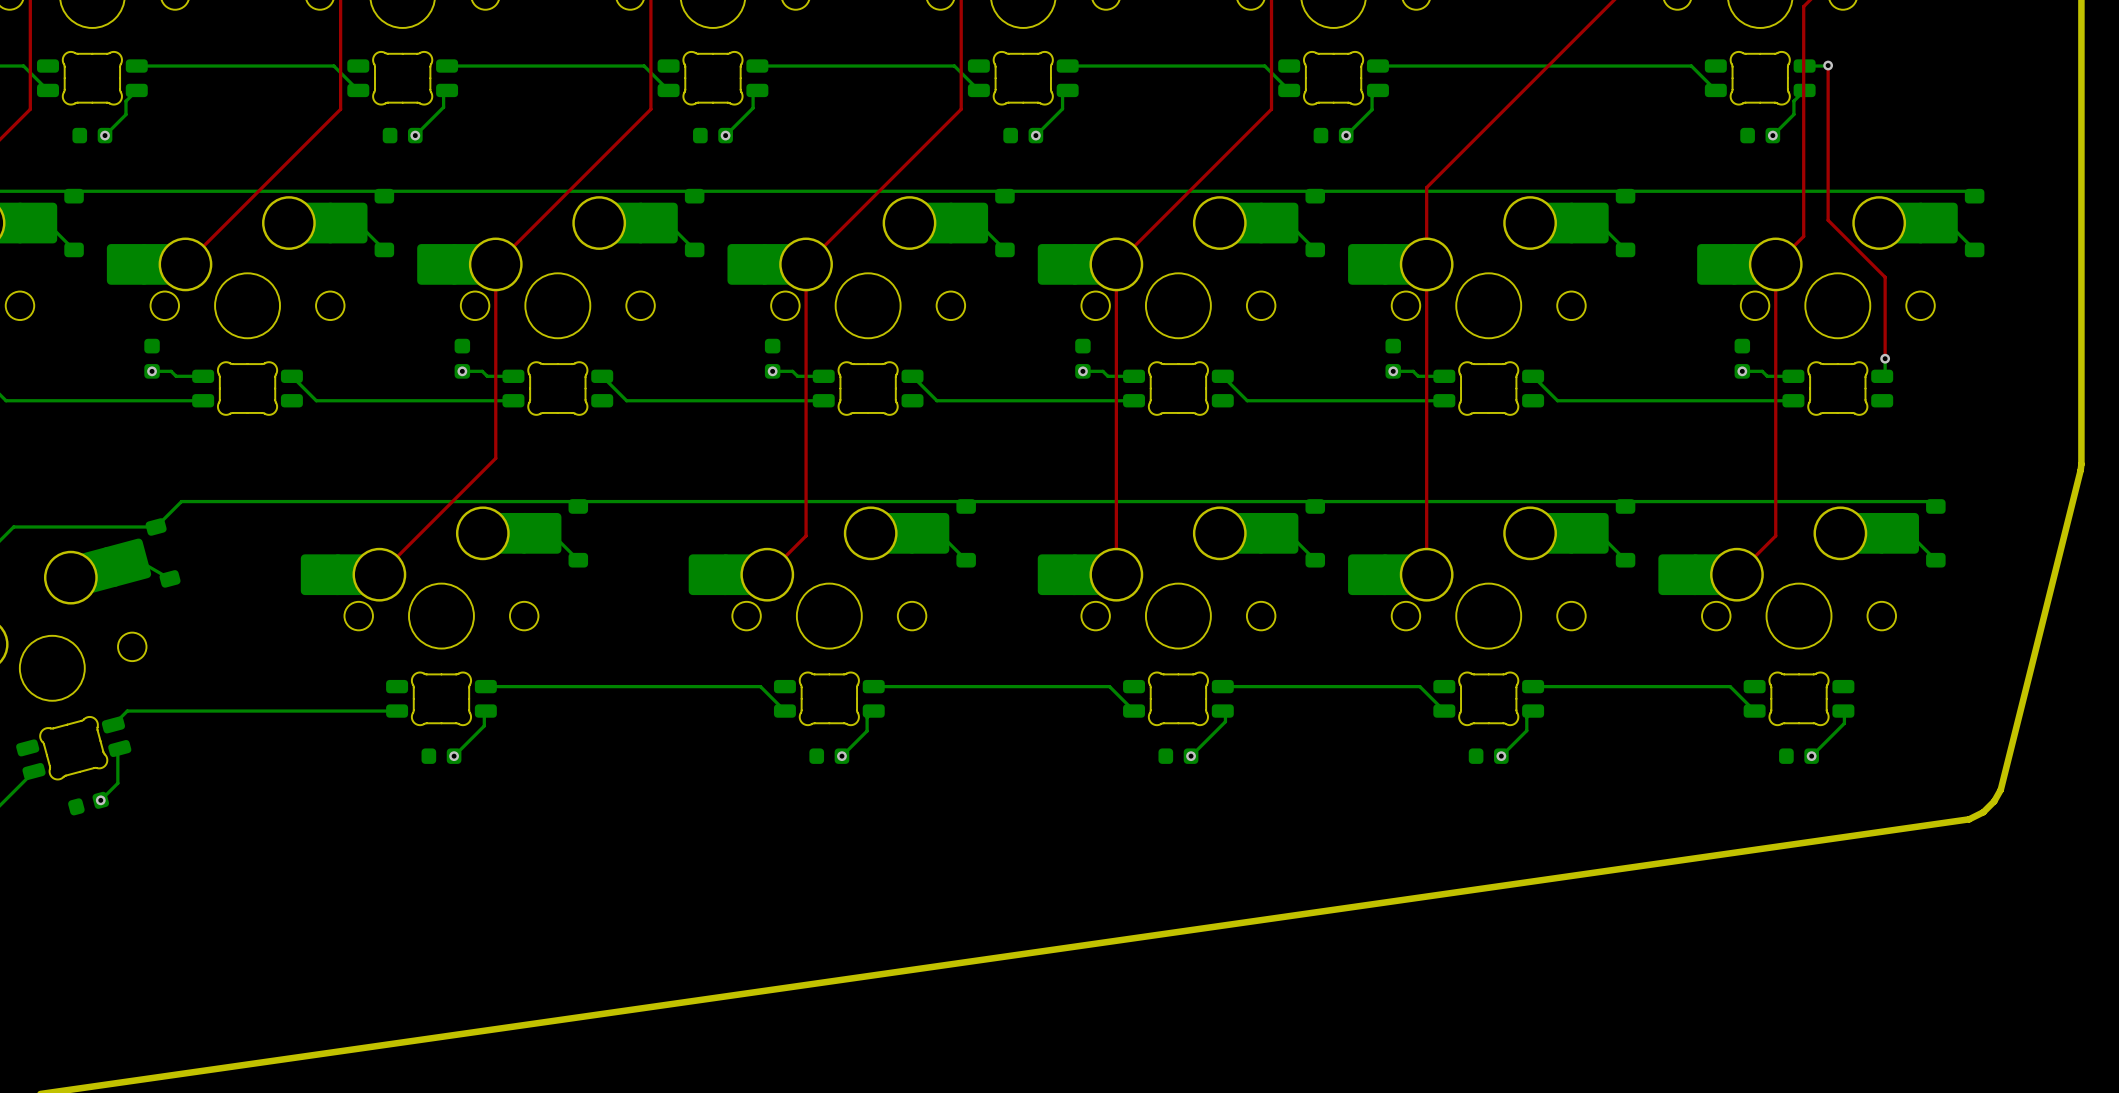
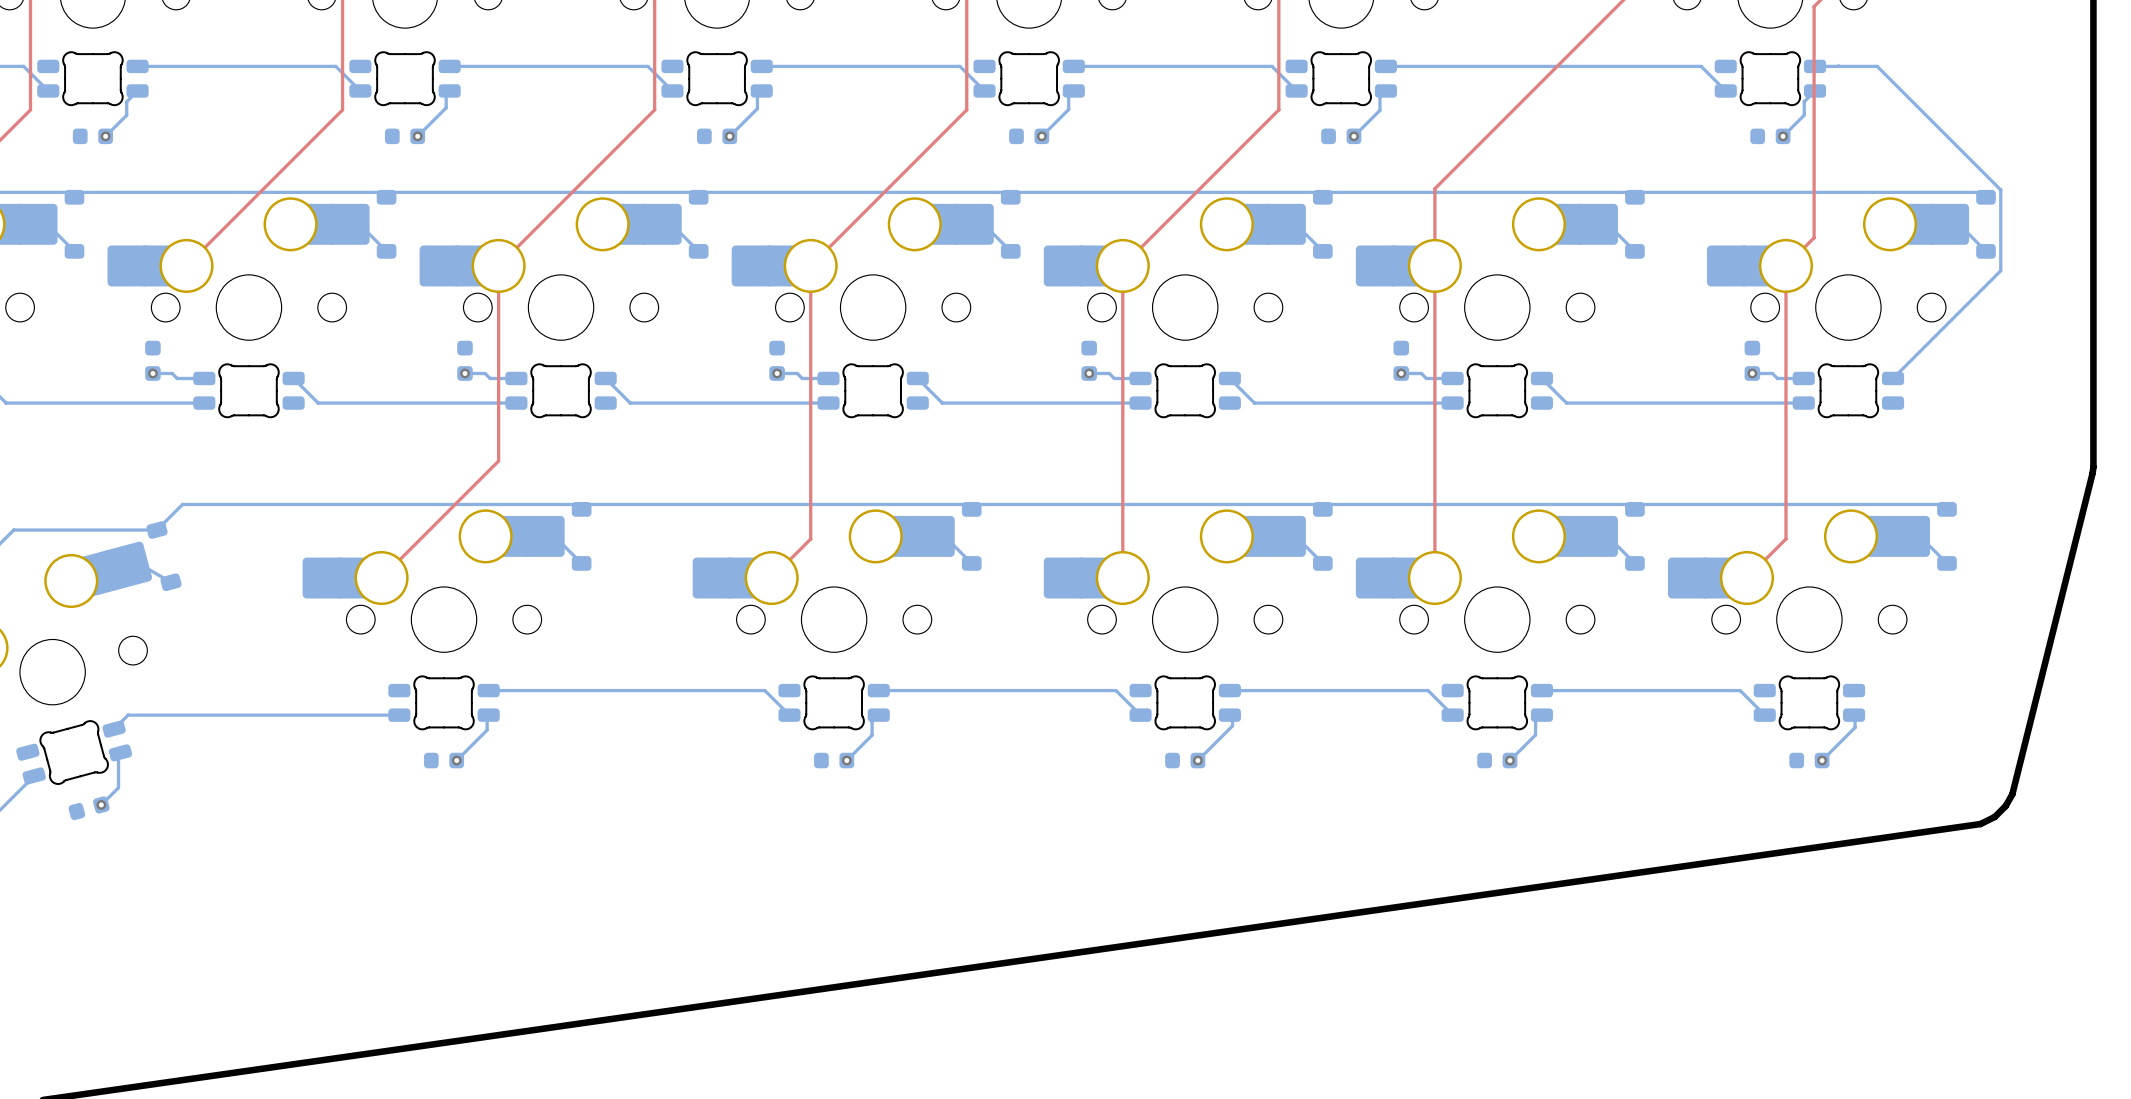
top track: (1828, 65) (1828, 220) (1885, 277) (1885, 358) -> none
via: (1828, 65) -> none
bottom track: (1885, 358) (1885, 373) -> (1838, 66) (1877, 66) (2000, 189) (2000, 270) (1896, 375)
via: (1885, 358) -> none

